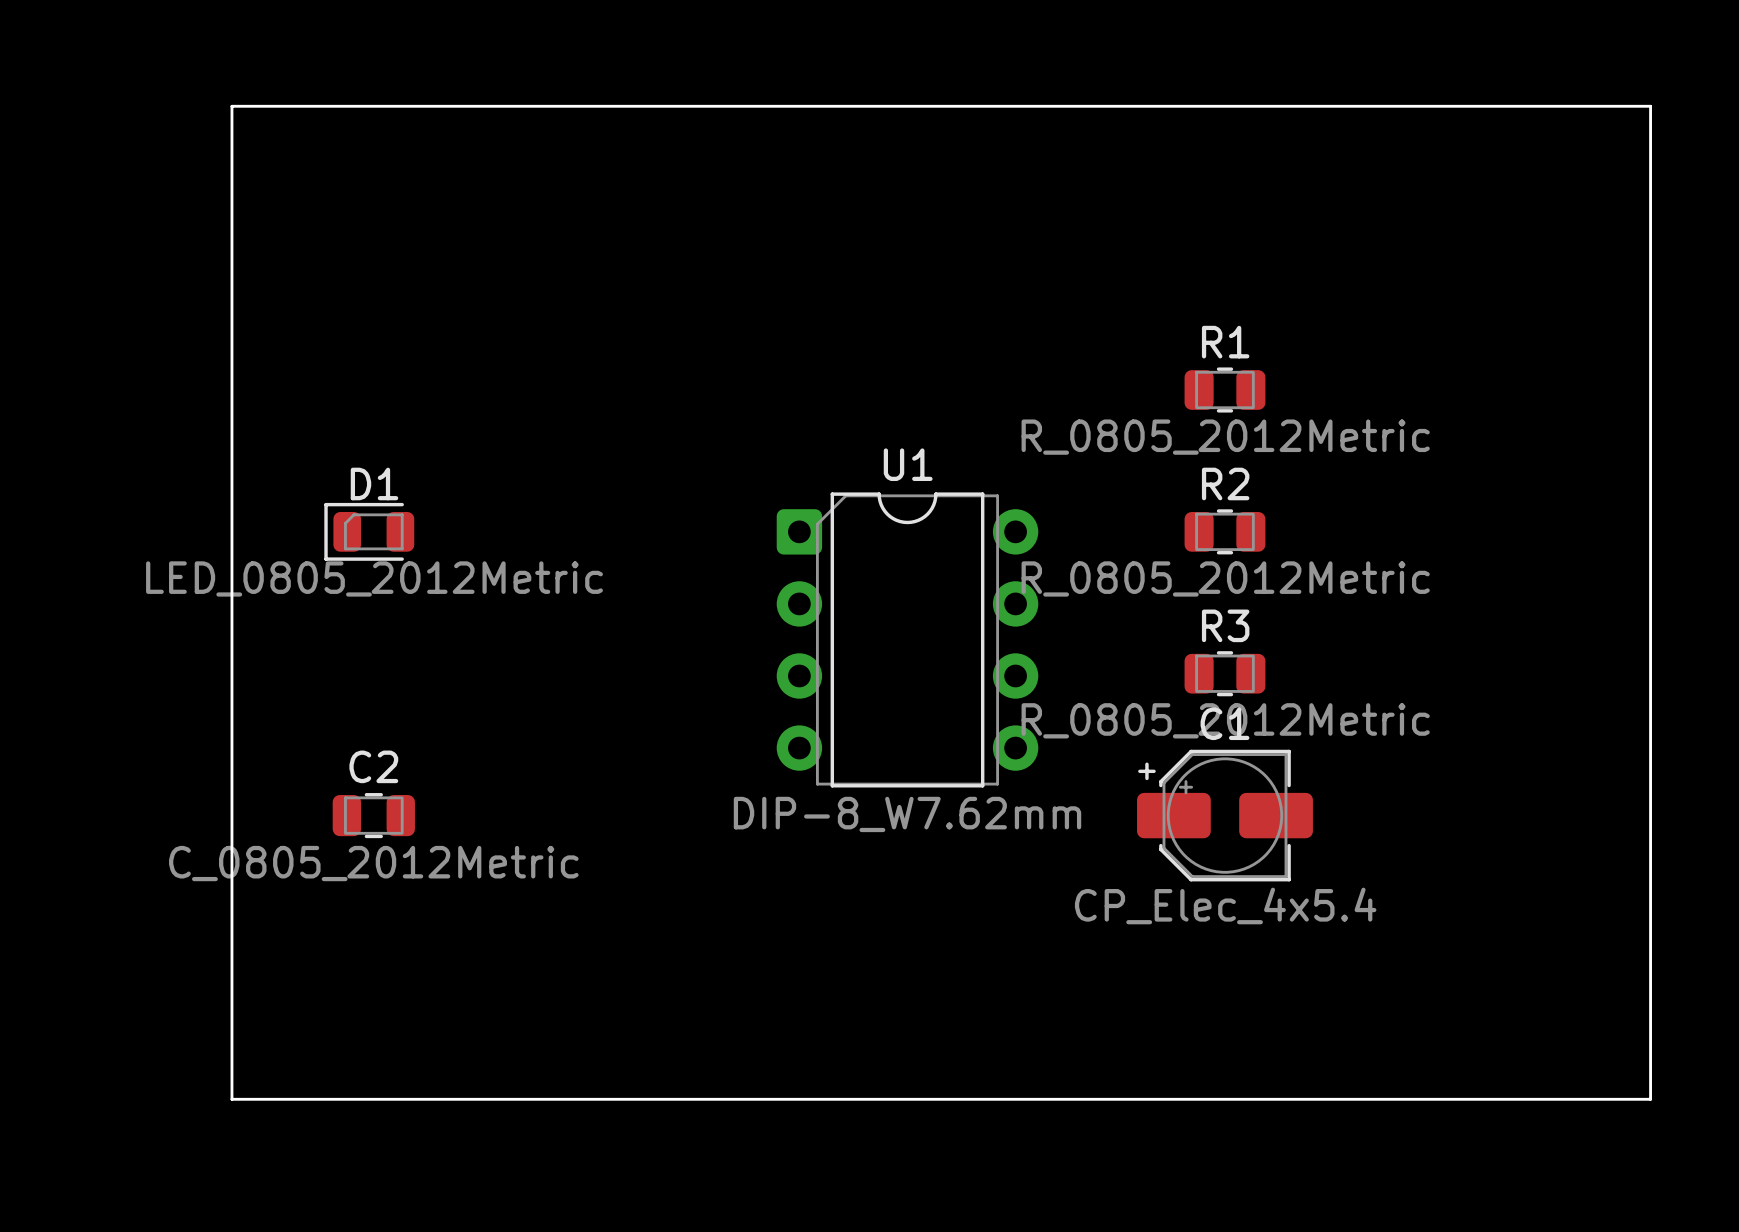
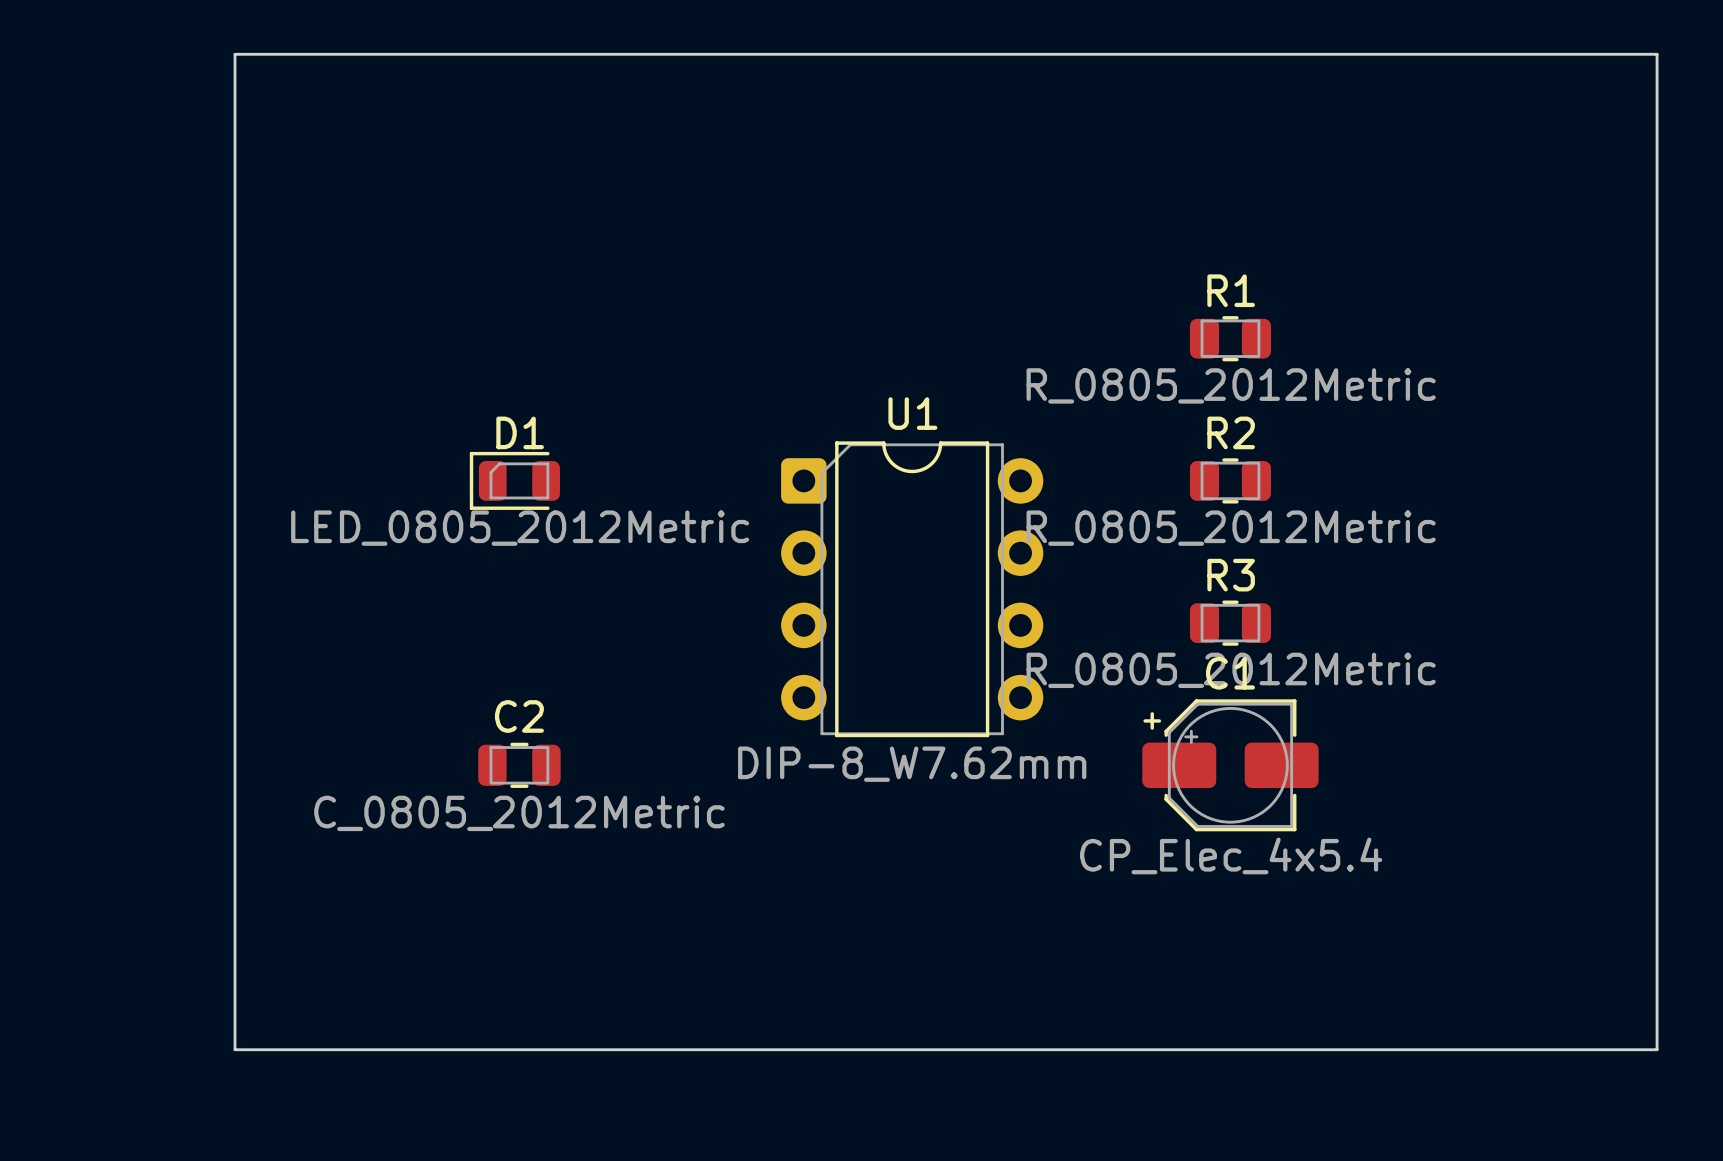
D1 position: (369, 531) -> (514, 480)
C2 position: (373, 815) -> (519, 765)

